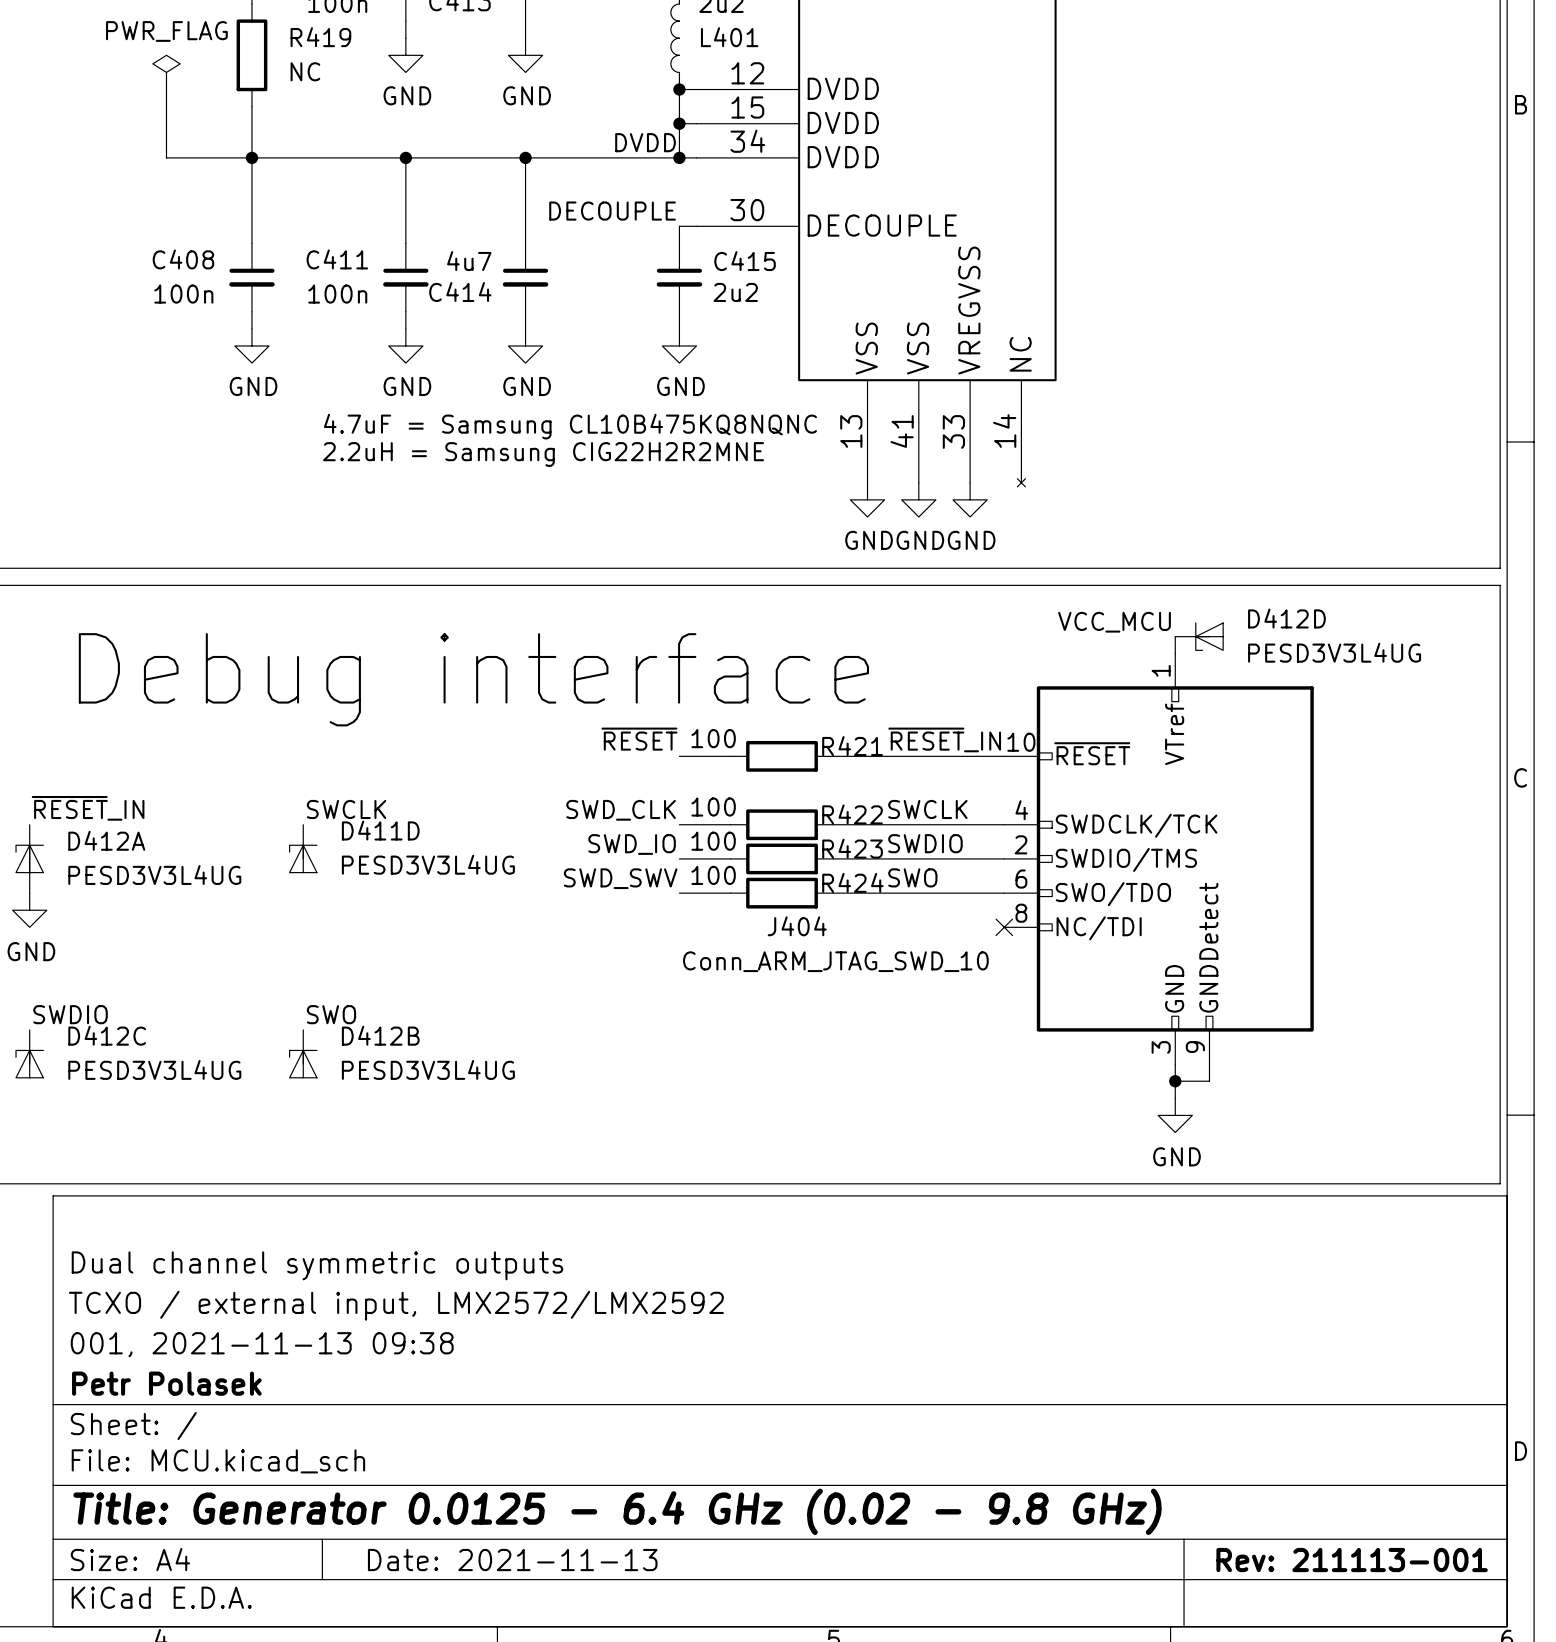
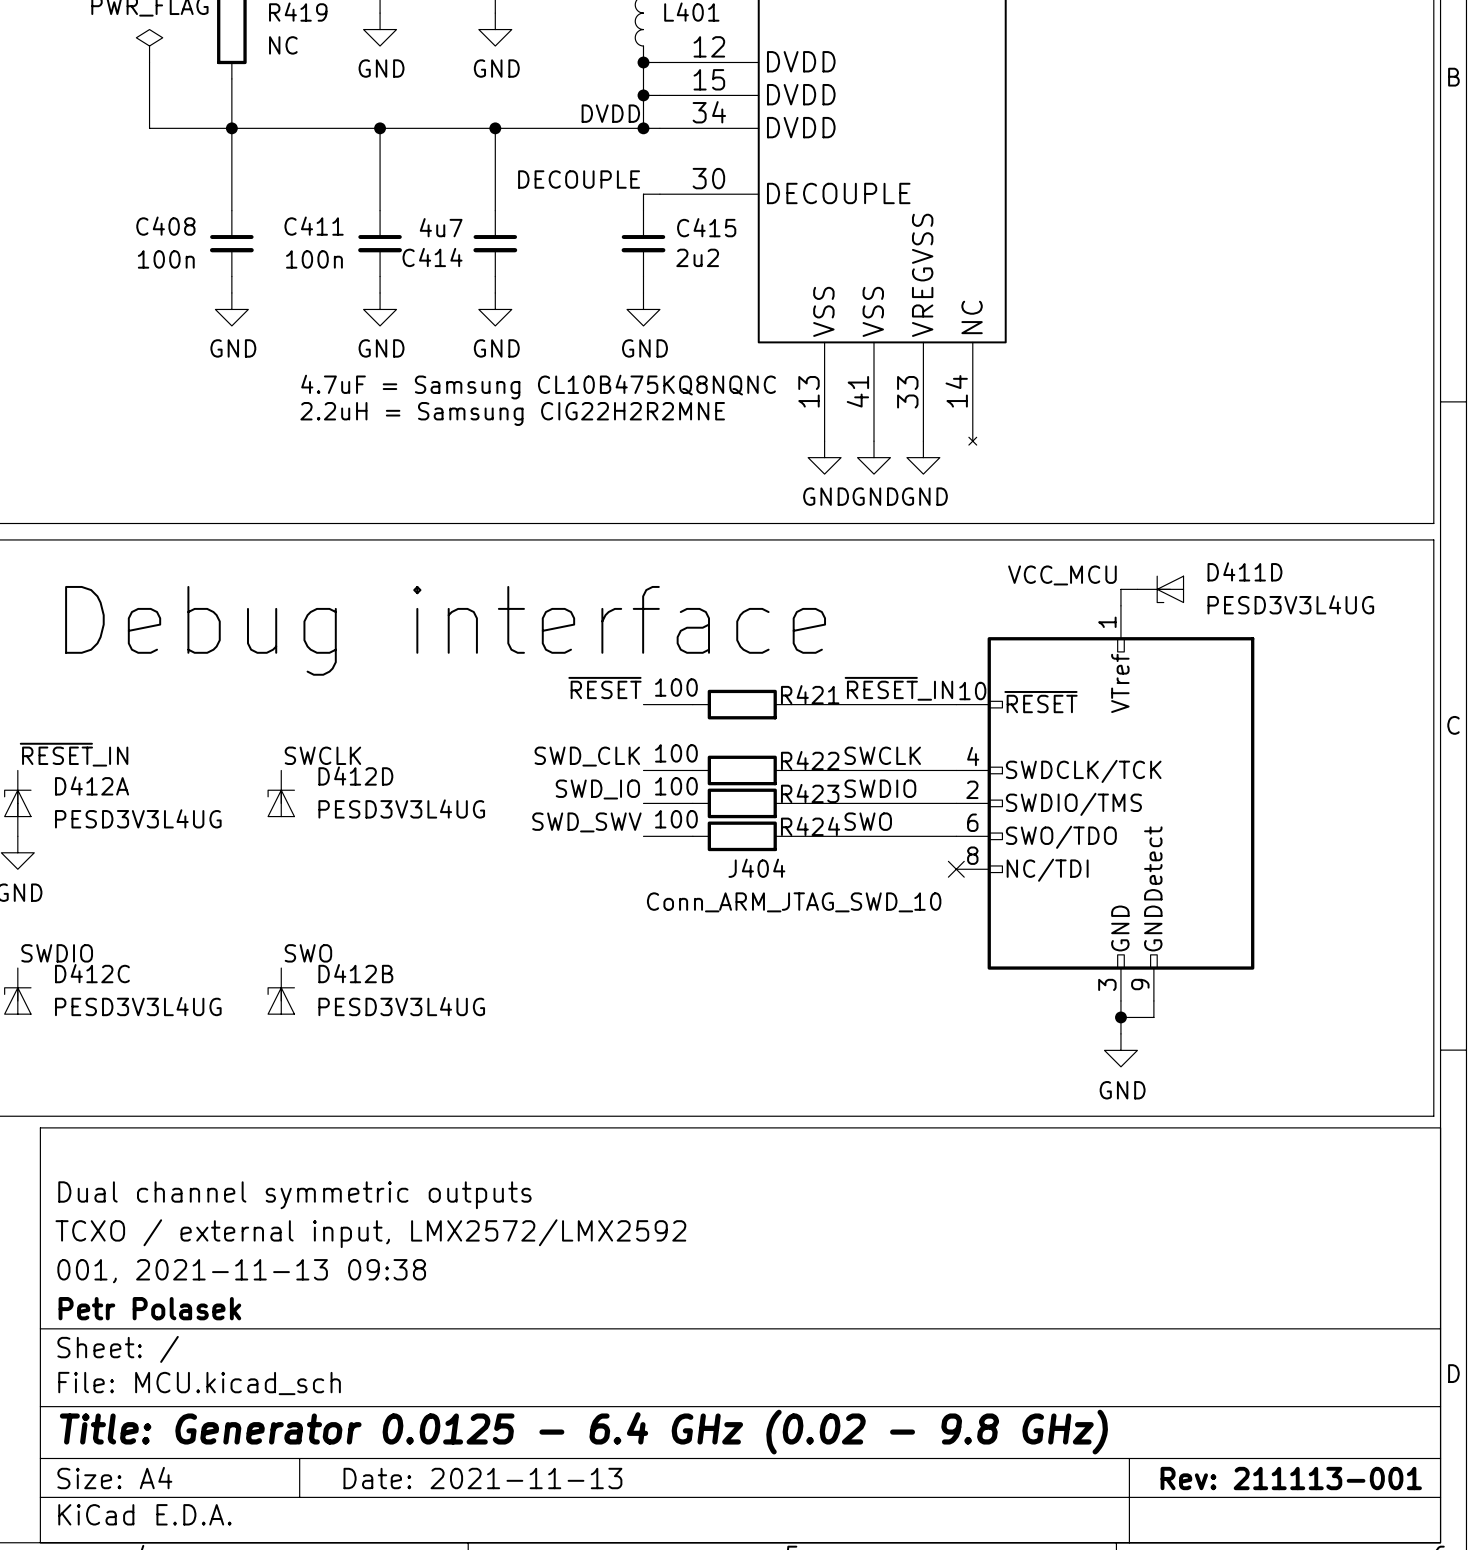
D412D: PESD3V3L4UG (1199, 636) -> none
D411D: none -> PESD3V3L4UG (1160, 589)
D411D name: D411D (380, 830) -> D412D (355, 776)

